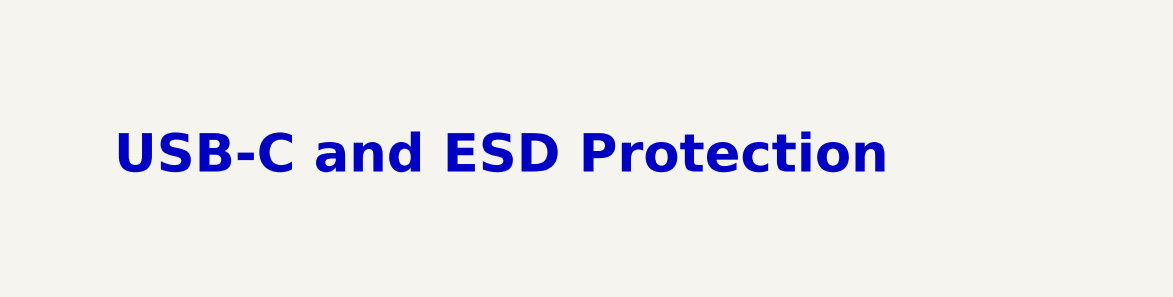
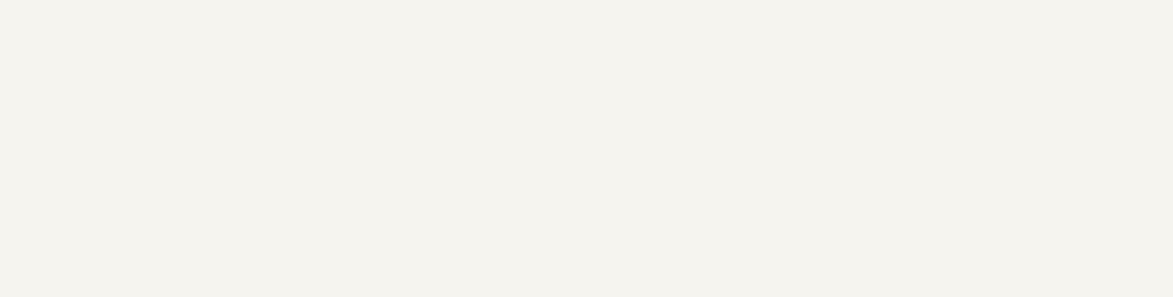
text: USB-C and ESD Protection (501, 151) -> none

